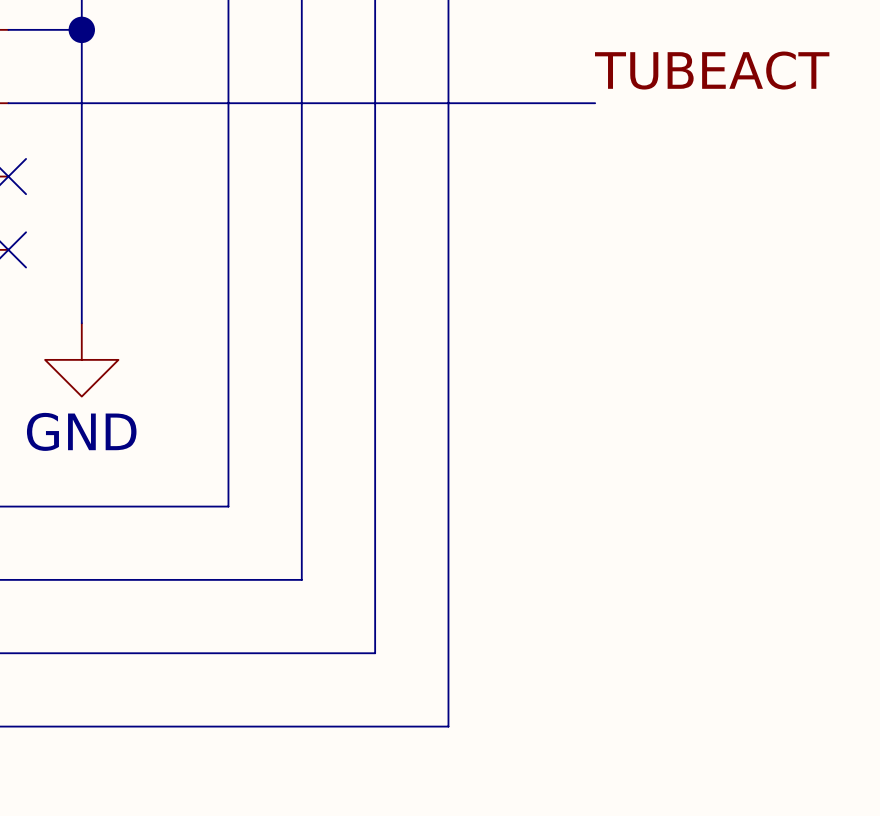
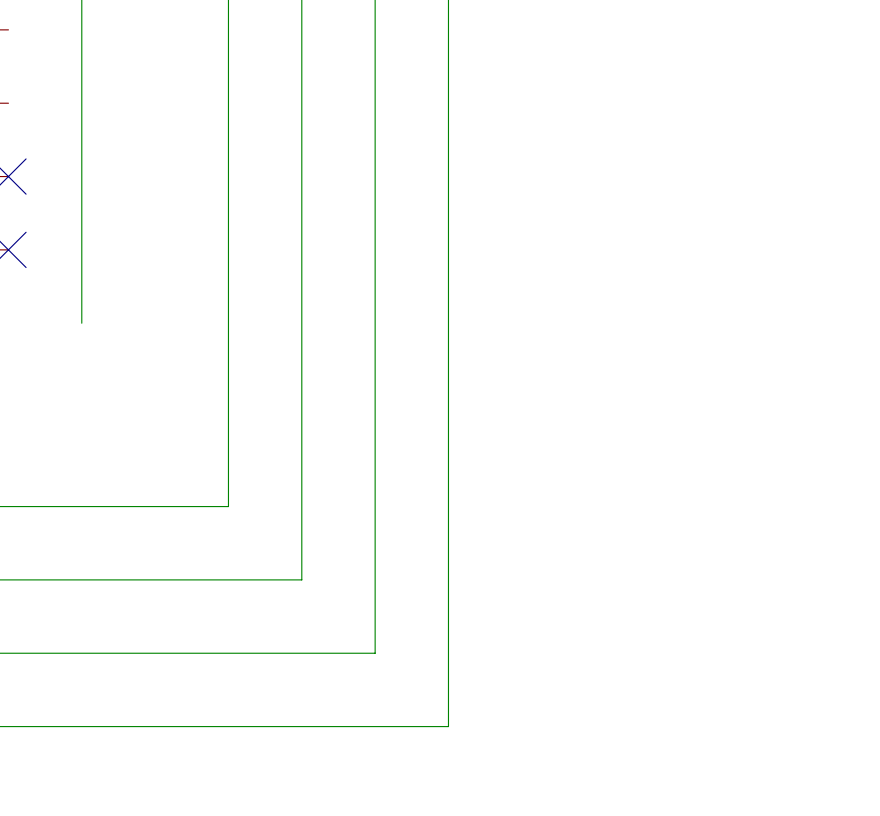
wire: (8, 29) (81, 29) -> none
junction: (81, 29) -> none
label: TUBEACT (712, 70) -> none
wire: (8, 103) (595, 103) -> none
power symbol: GND (81, 359) -> none

